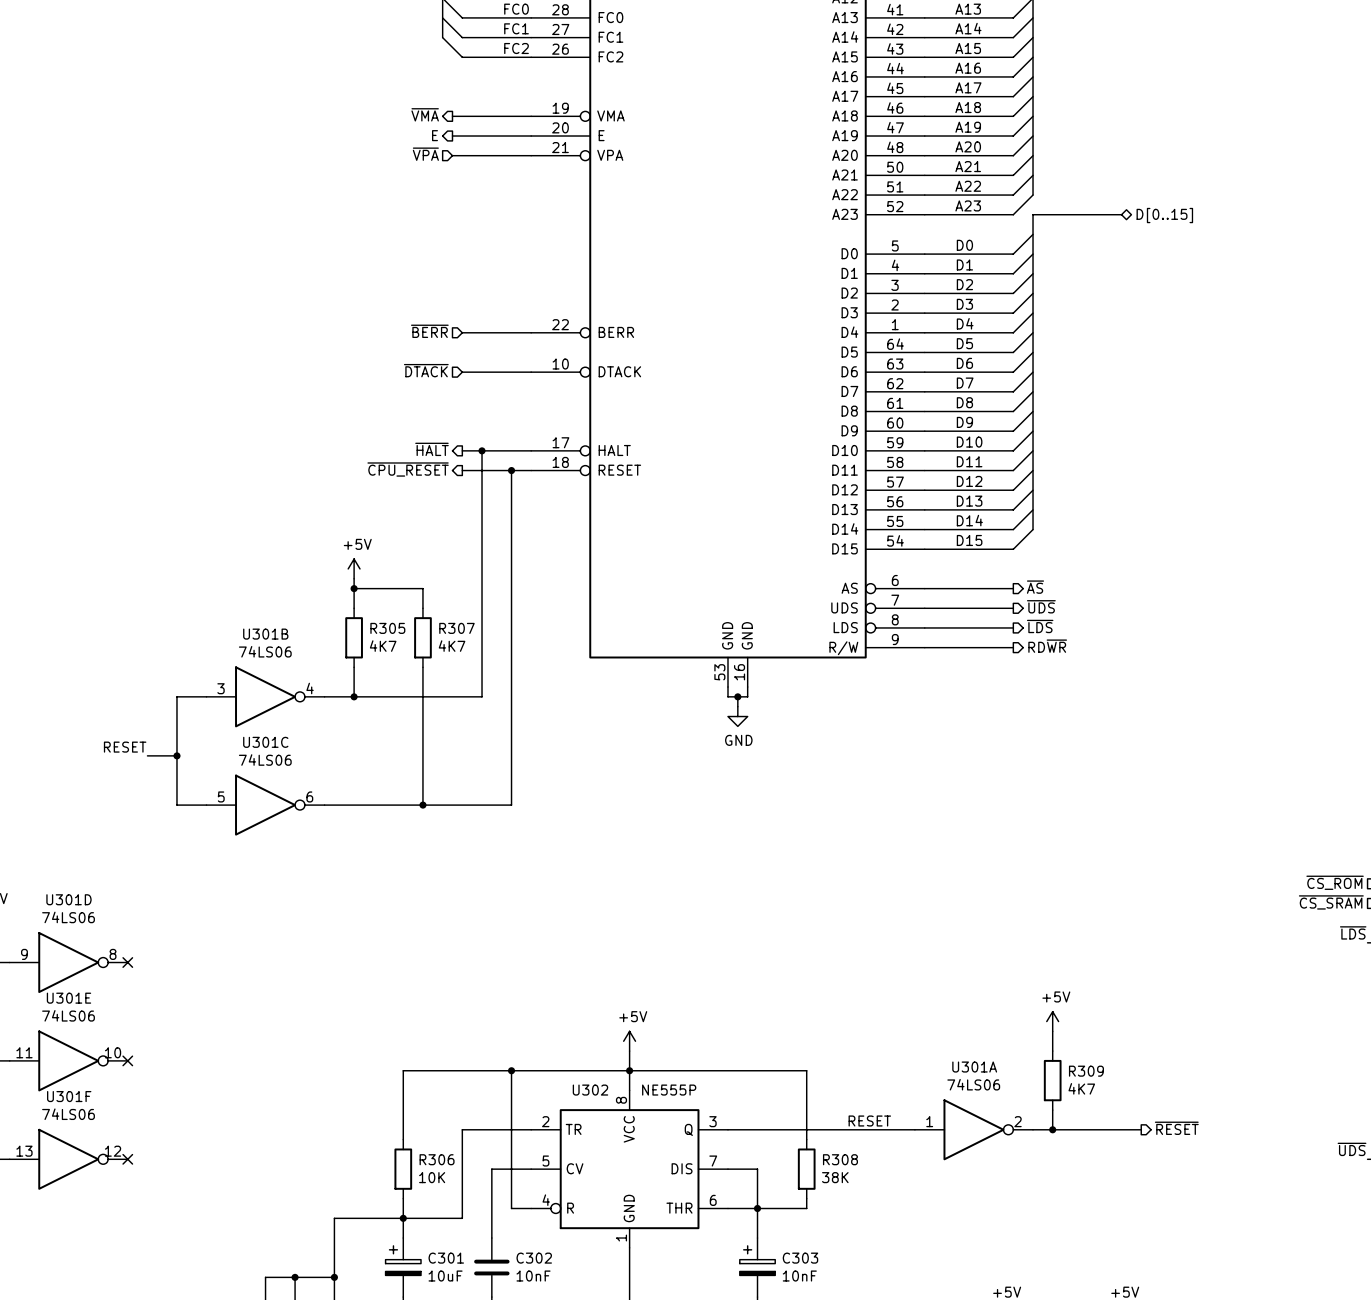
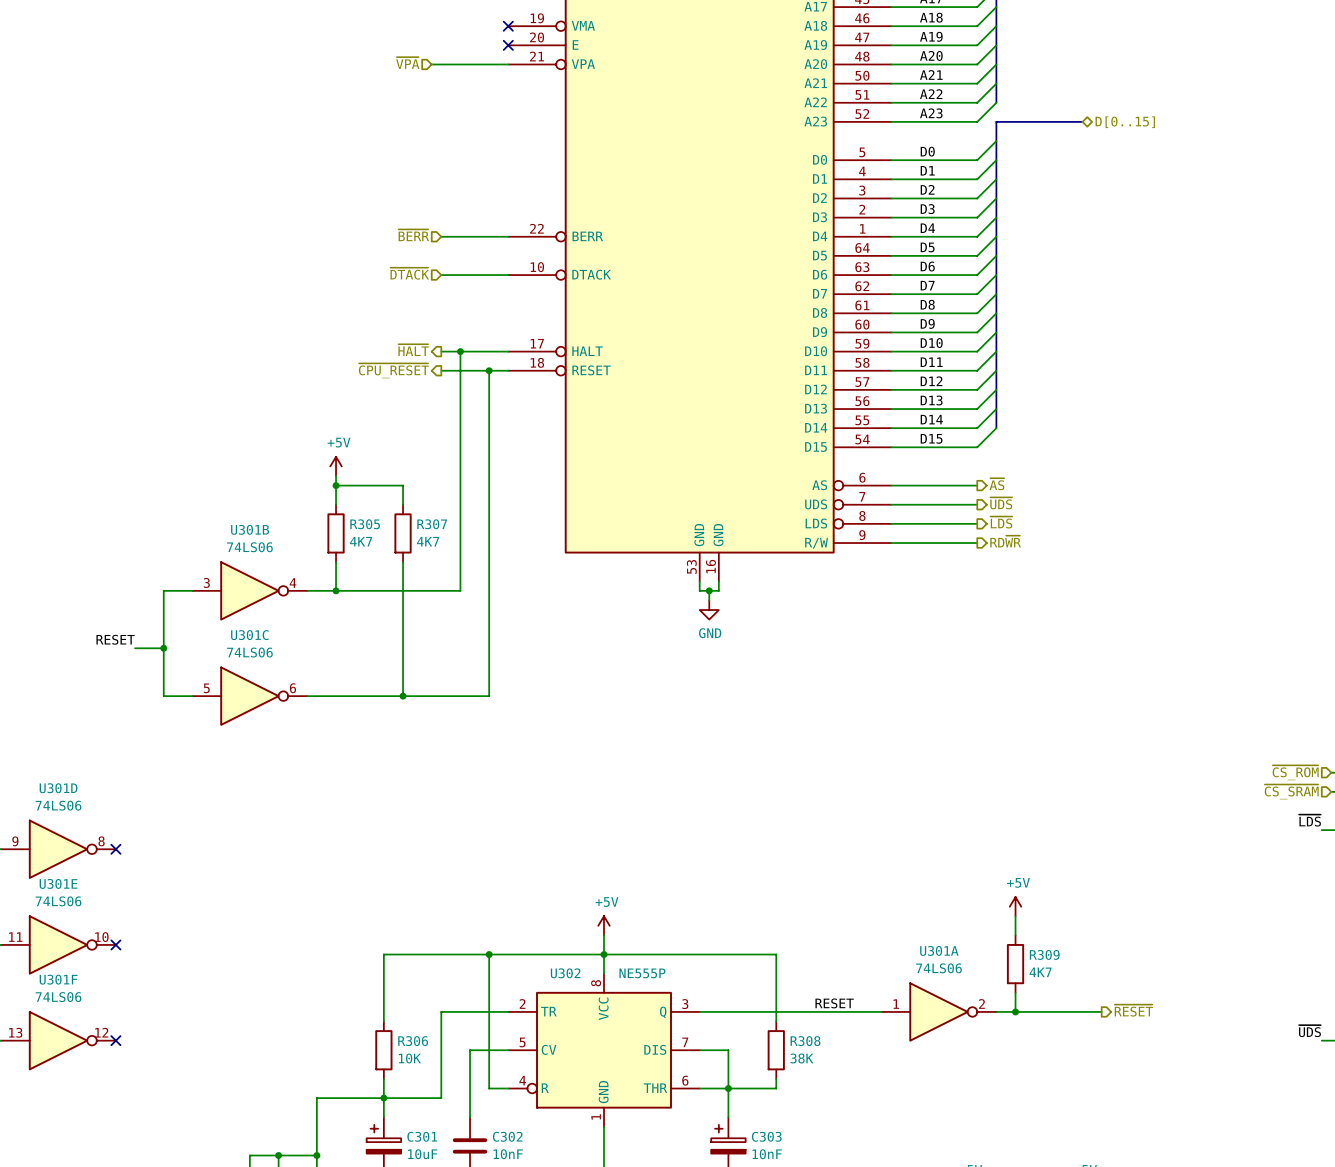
hierarchical label: ~{VMA} (425, 114) -> none
wire: (452, 116) (531, 116) -> none
no-connect mark: none -> (508, 26)
hierarchical label: E (435, 135) -> none
wire: (452, 136) (531, 136) -> none
no-connect mark: none -> (508, 45)

